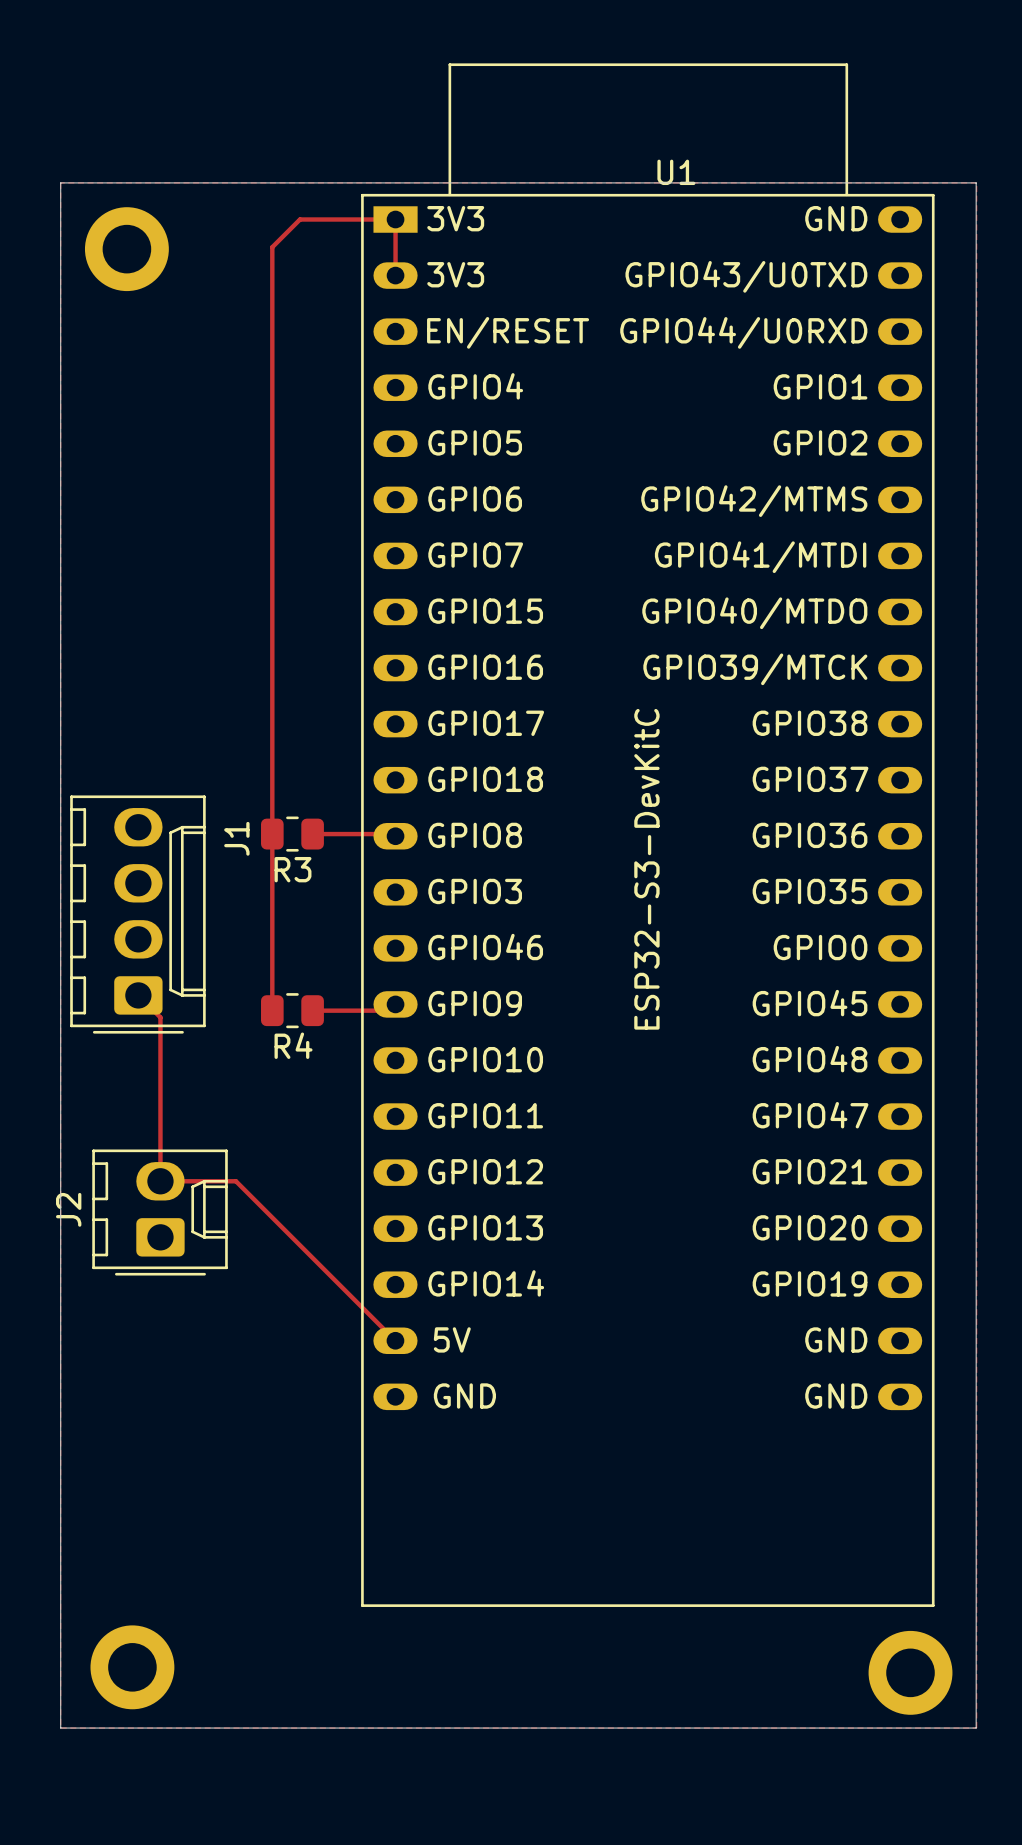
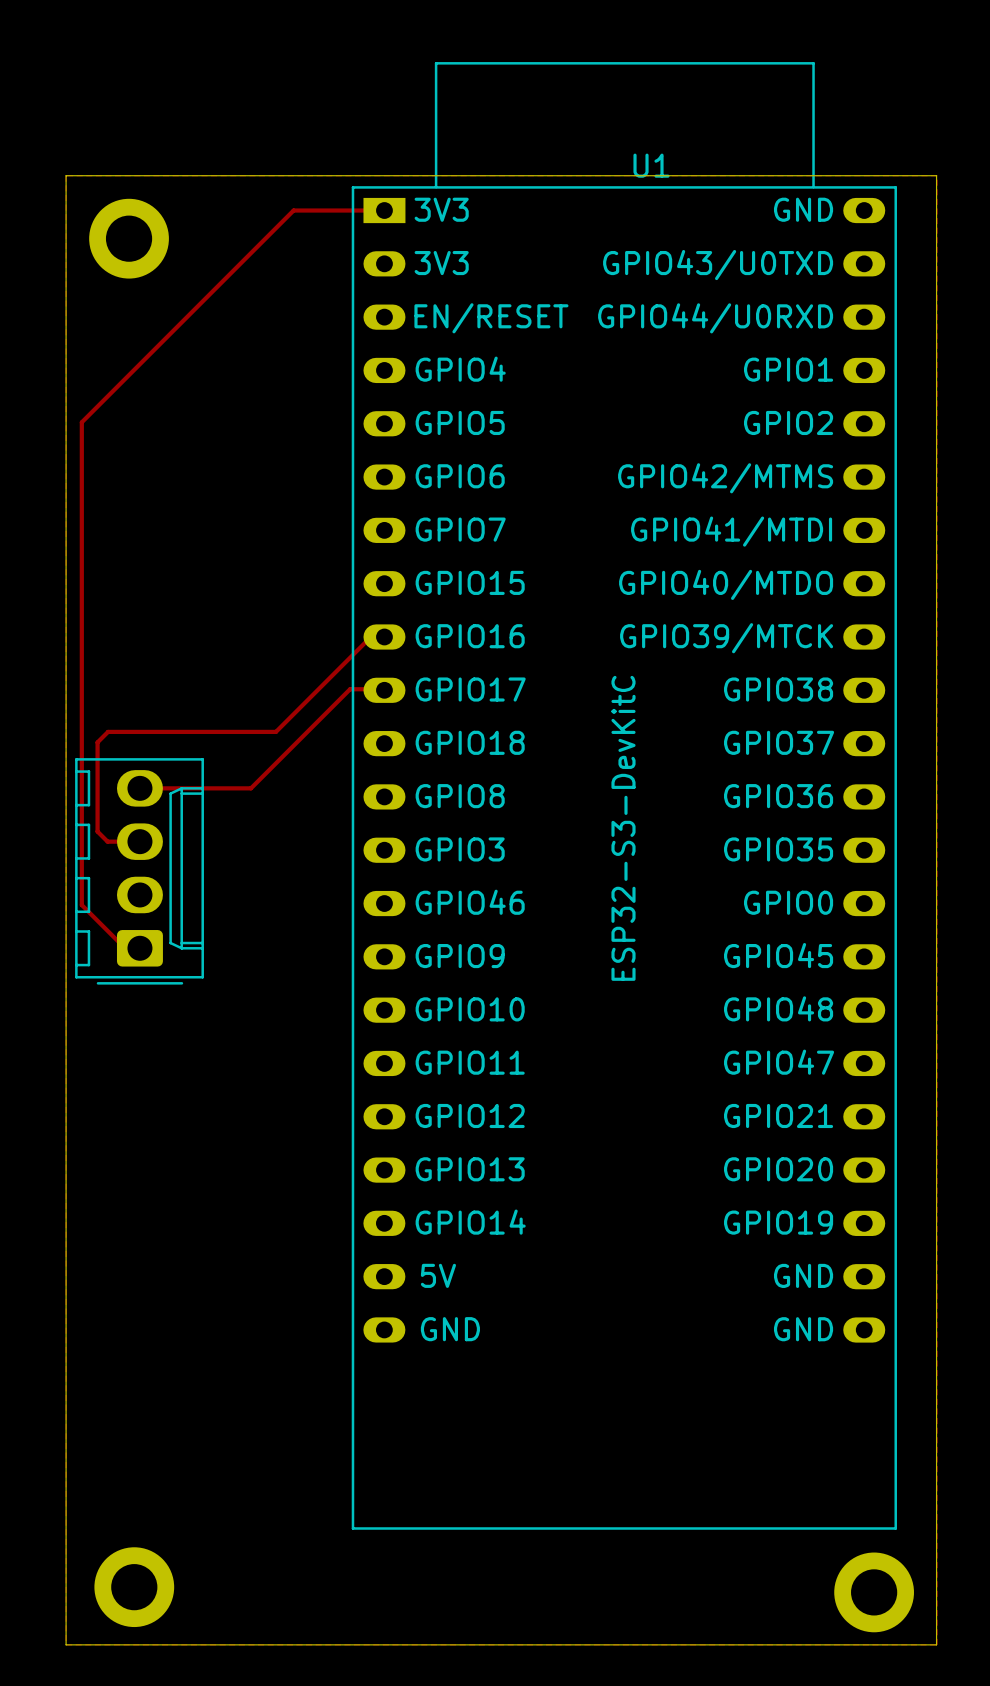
track: (395, 219) (395, 275) -> none
track: (272, 247) (272, 1010) (270, 1008) -> (267, 236) (81, 422) (81, 905) (125, 948) (139, 948)
track: none -> (384, 635) (371, 635) (275, 731) (108, 731) (97, 742) (97, 831) (107, 841) (139, 841)
track: none -> (384, 689) (350, 689) (250, 788) (139, 788)
R3: (292, 834) -> none
track: (312, 834) (393, 834) -> none
J1 name: J1 (236, 838) -> none
track: (138, 995) (160, 1017) (160, 1181) (235, 1181) (395, 1340) -> none
R4: (292, 1010) -> none
track: (312, 1010) (389, 1010) -> none
J2: (160, 1212) -> none

